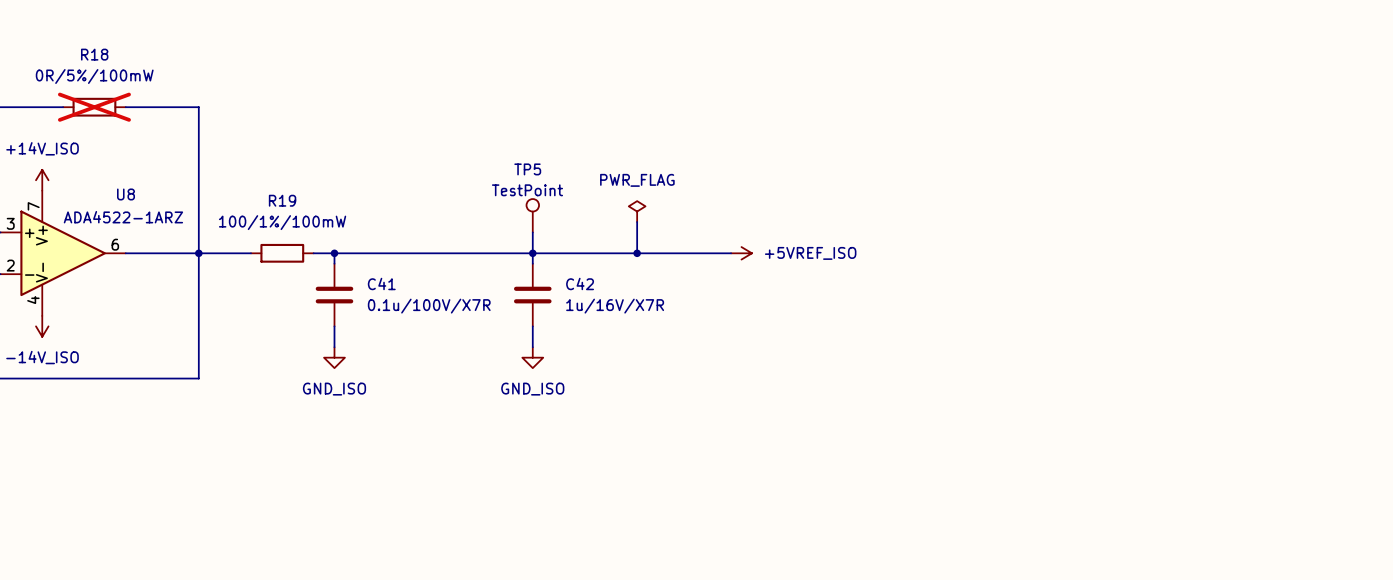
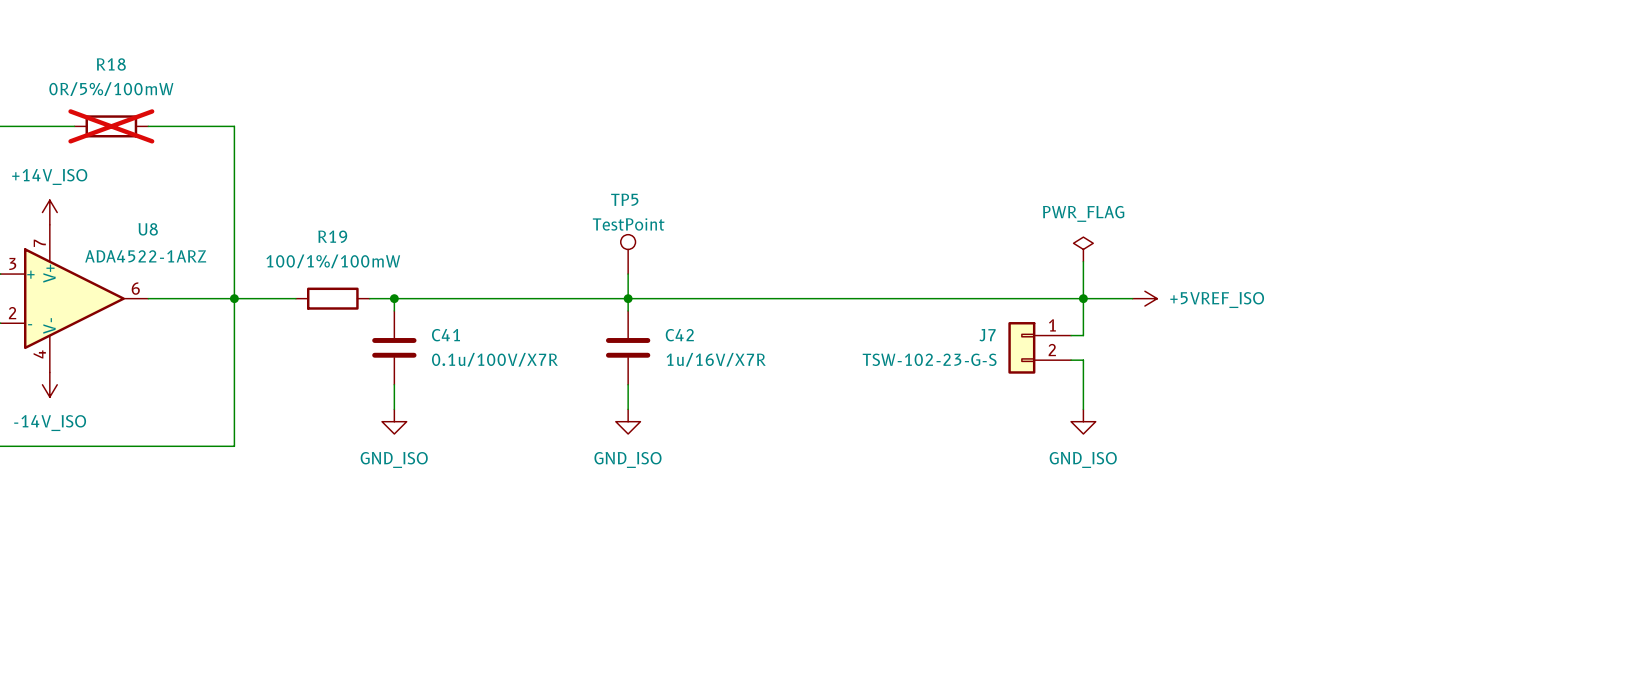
power symbol: PWR_FLAG (637, 211) -> none
power symbol: none -> PWR_FLAG (1083, 249)
wire: (637, 222) (637, 253) -> none
wire: none -> (1083, 261) (1083, 335) (1071, 335)
junction: (637, 253) -> none
wire: none -> (861, 298) (1132, 298)
power symbol: +5VREF_ISO (741, 253) -> none
junction: none -> (1083, 298)
power symbol: none -> +5VREF_ISO (1144, 298)
J7: none -> TSW-102-23-G-S (1039, 347)
wire: none -> (1071, 360) (1083, 360) (1083, 409)
power symbol: none -> GND_ISO (1083, 421)

